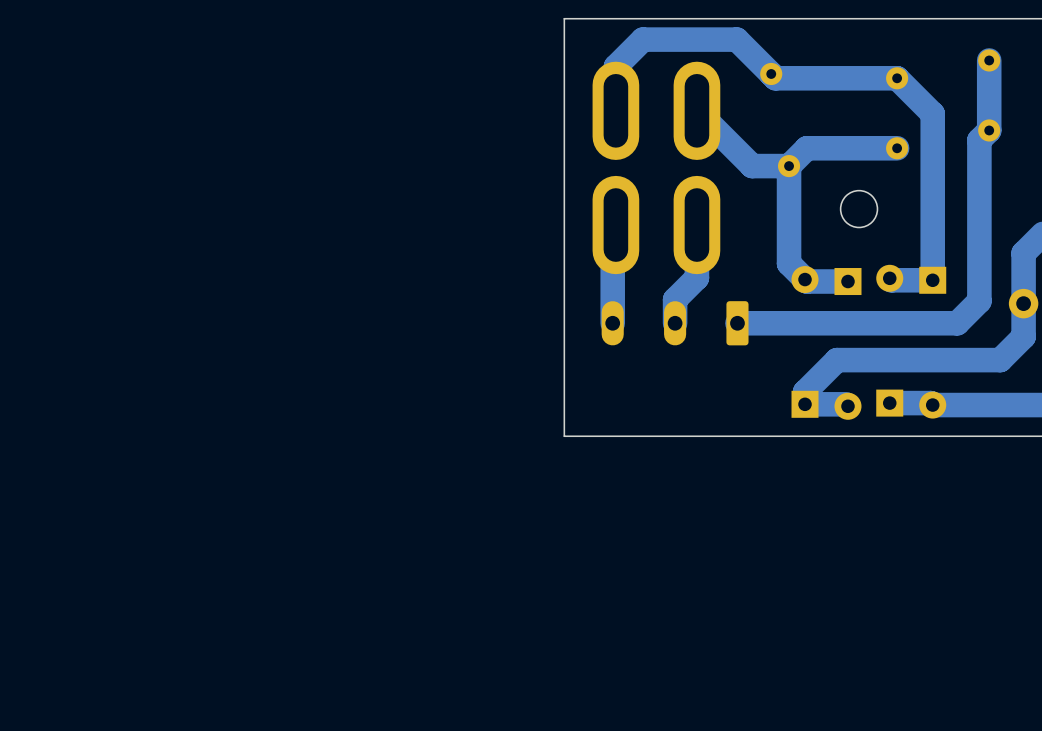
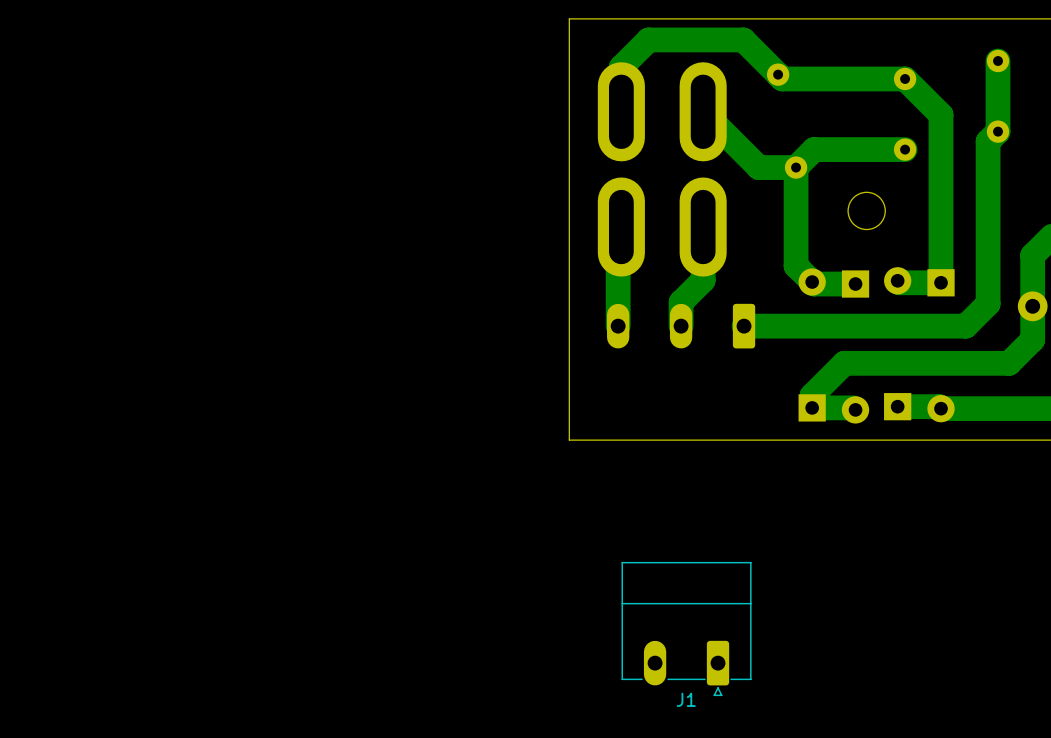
J1: none -> (686, 629)

